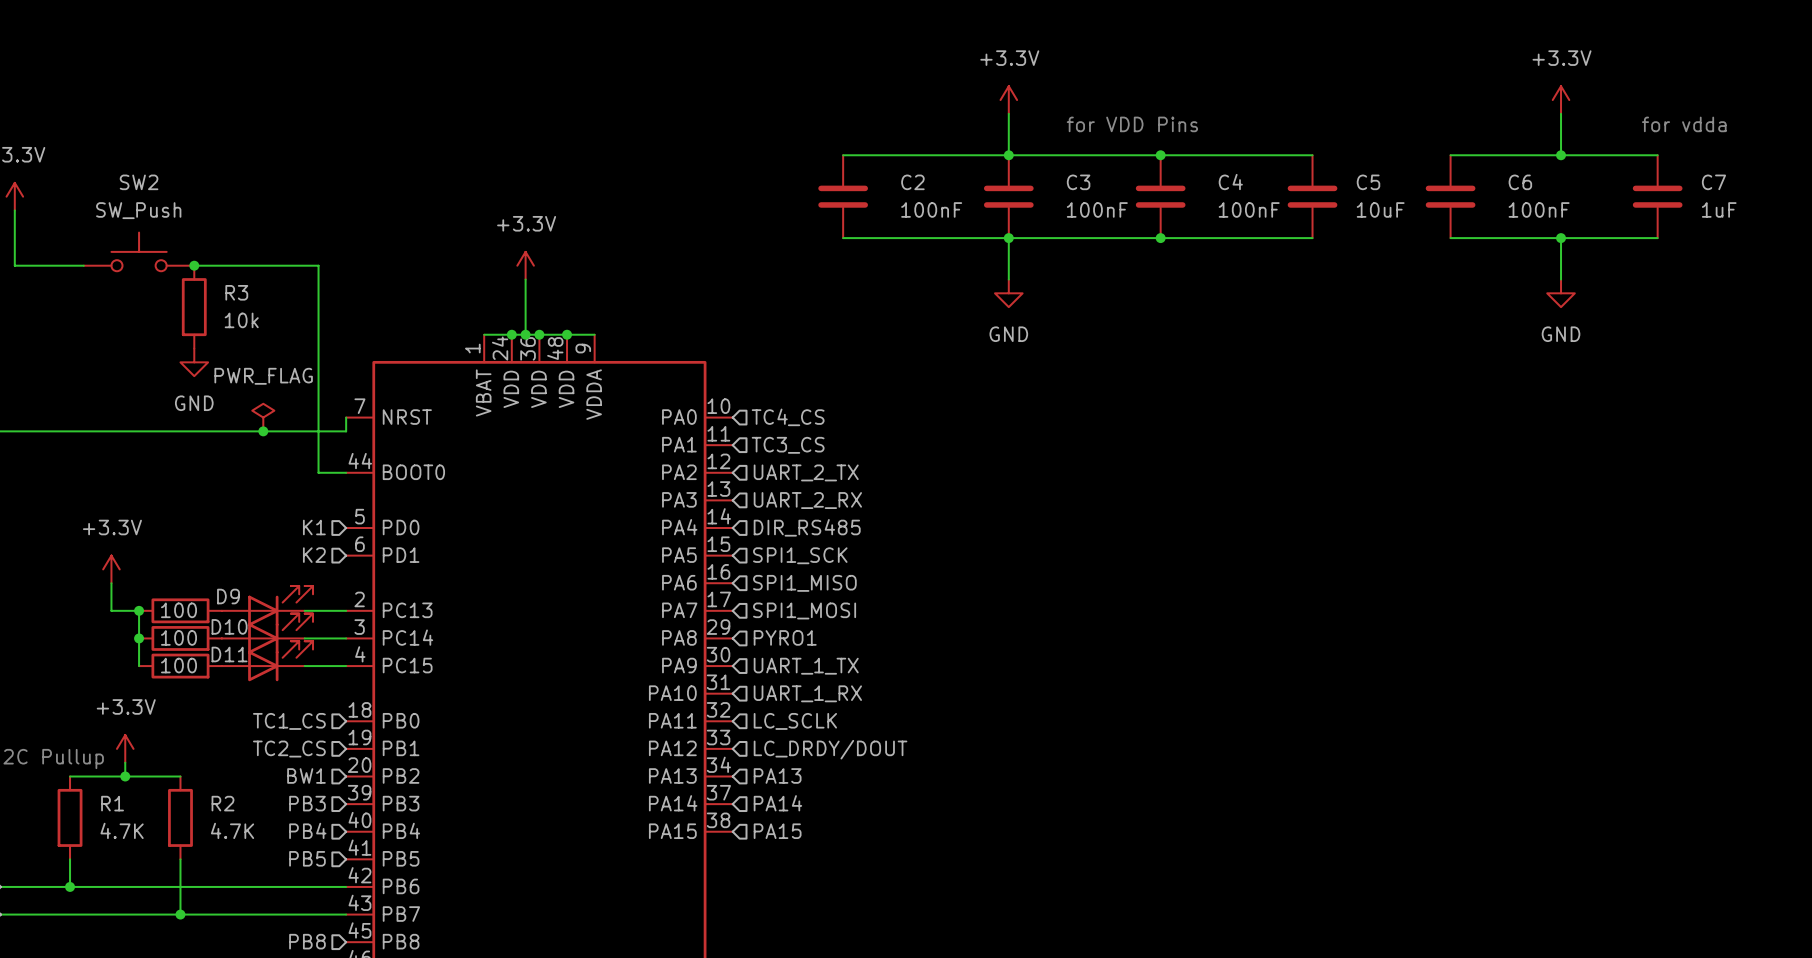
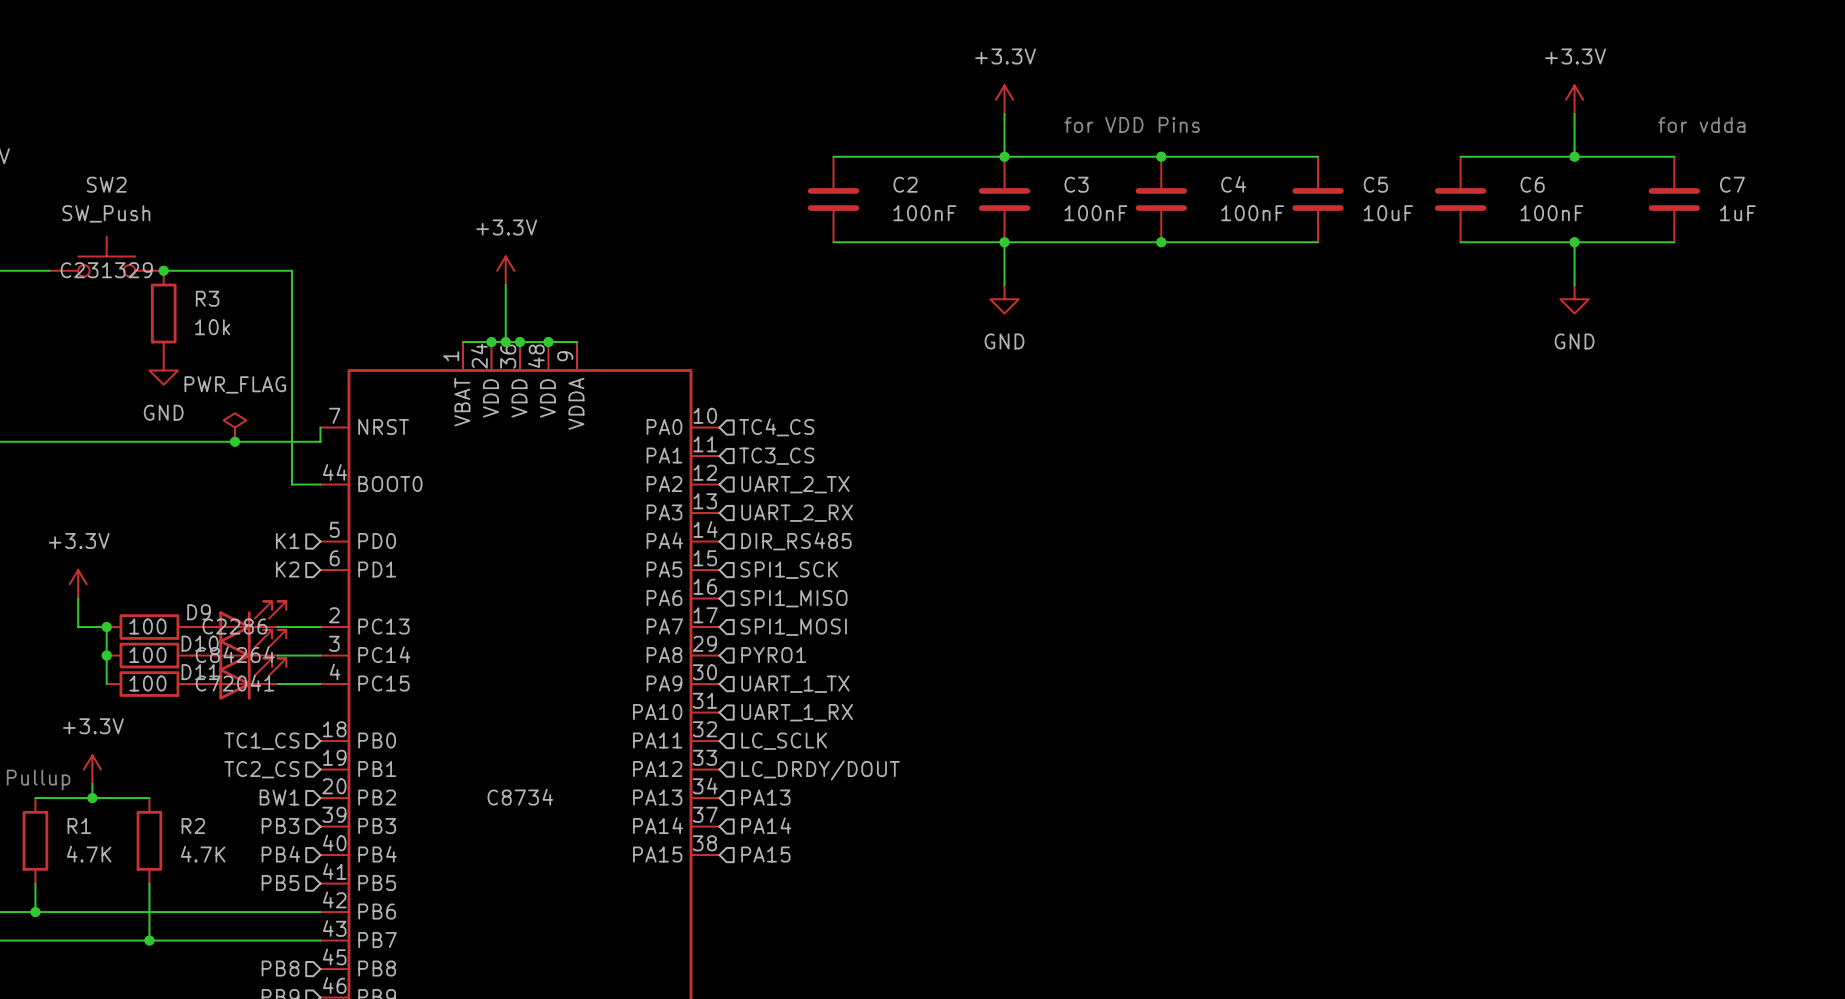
SW2 text: none -> C231329 (106, 270)
D9 text: none -> C2286 (234, 626)
D10 text: none -> C84264 (235, 654)
D11 text: none -> C72041 (234, 683)
part text: none -> C8734 (520, 797)

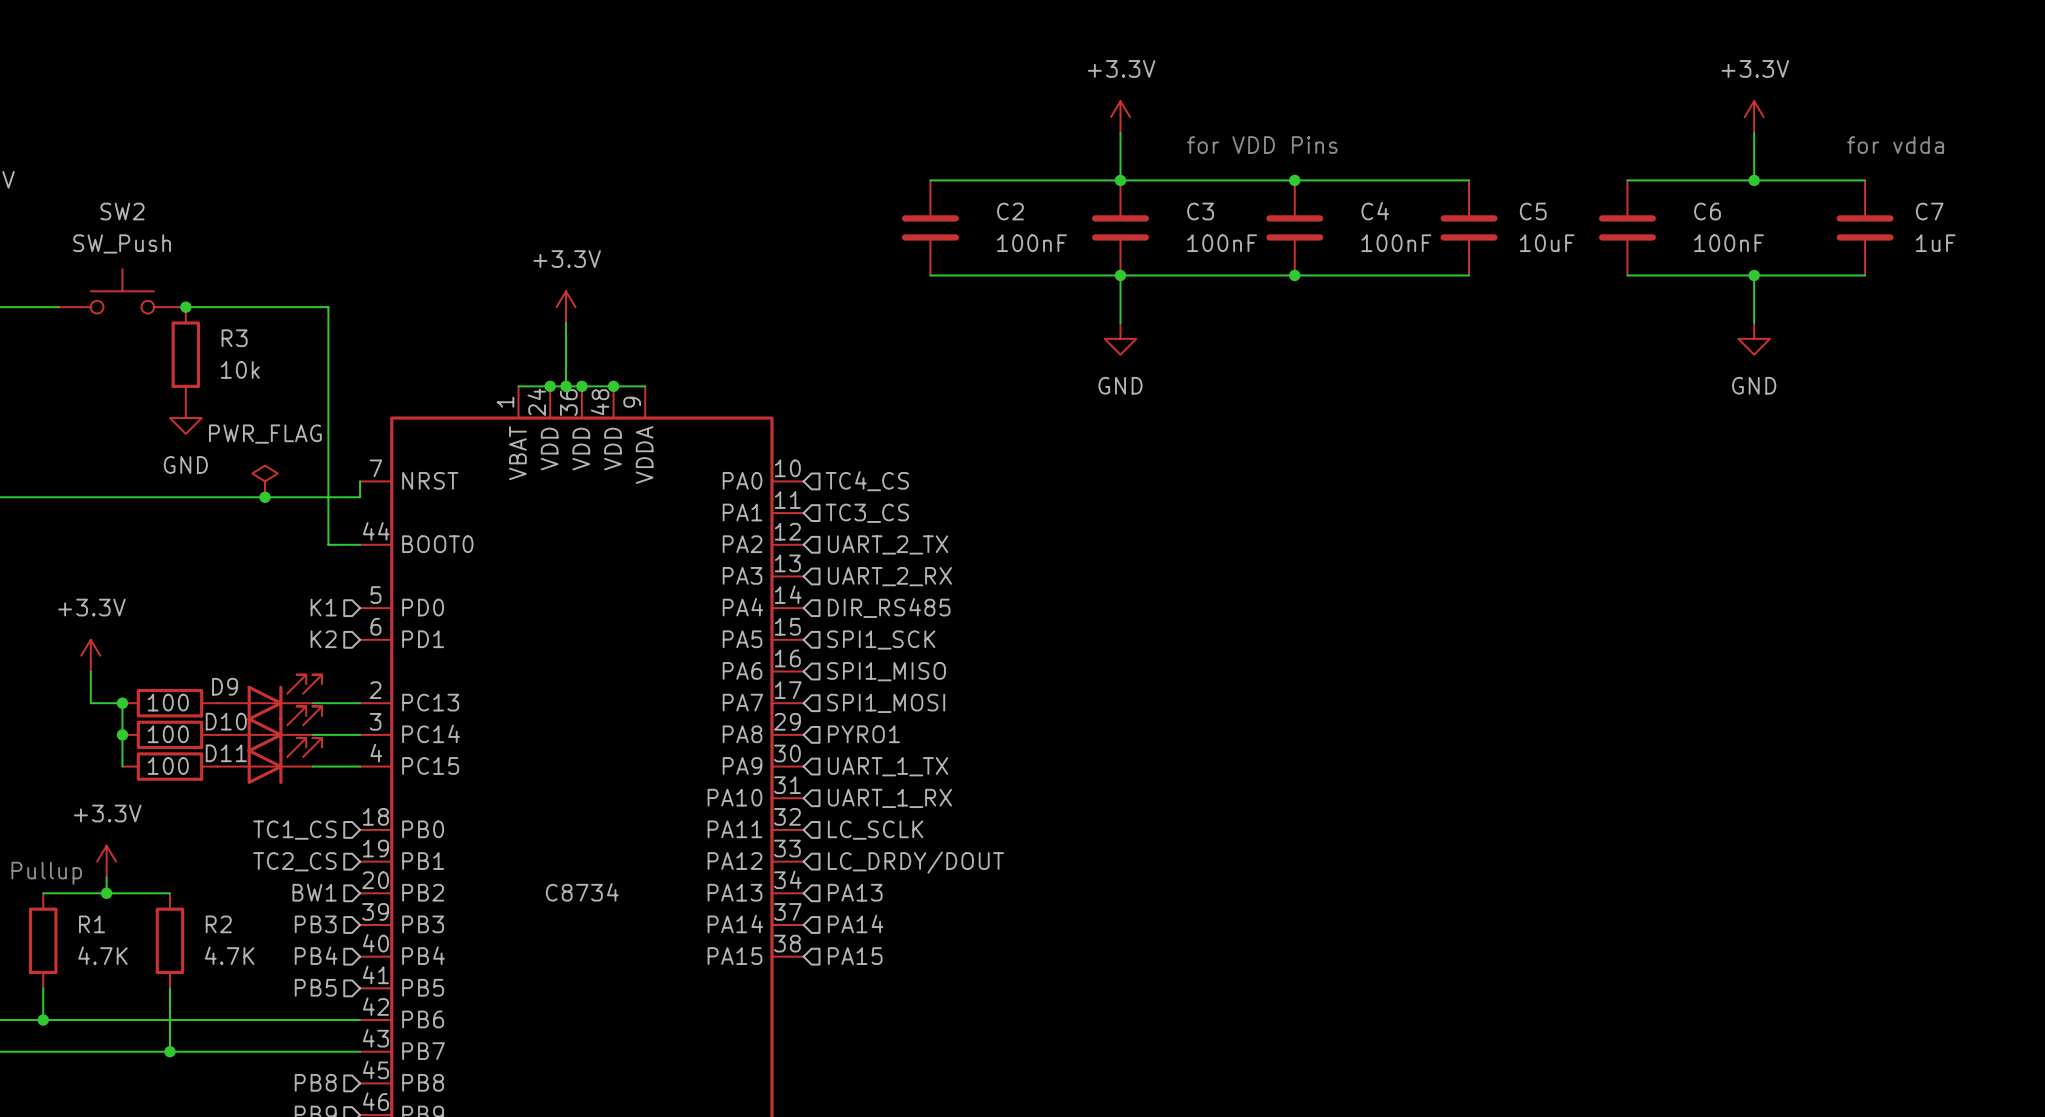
SW2 text: C231329 (106, 270) -> none
D9 text: C2286 (234, 626) -> none
D10 text: C84264 (235, 654) -> none
D11 text: C72041 (234, 683) -> none

